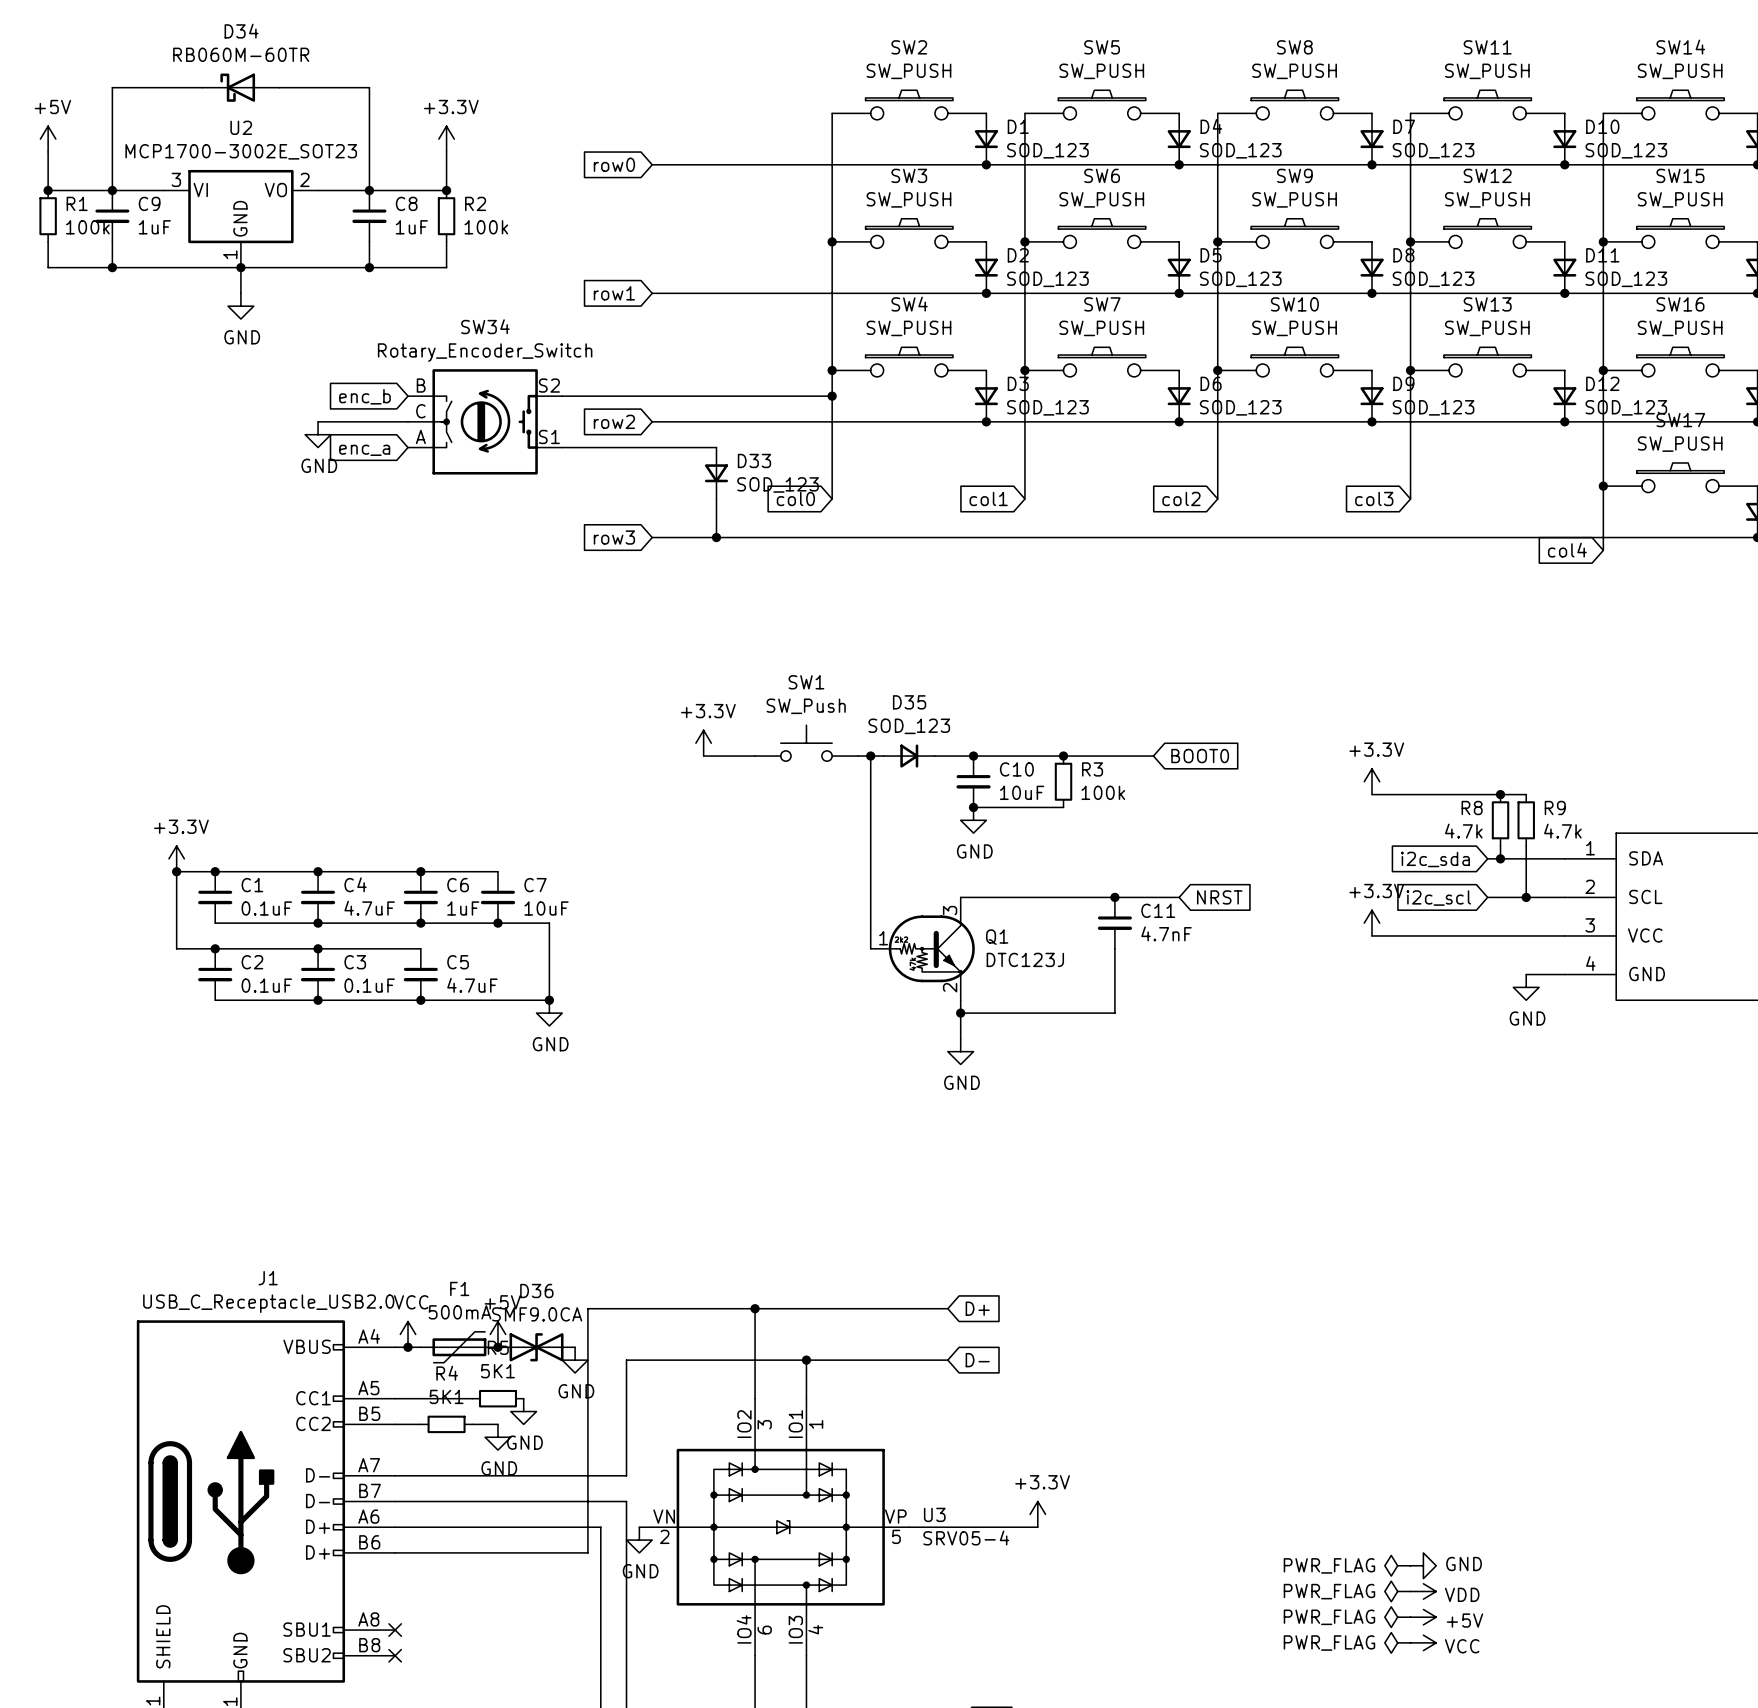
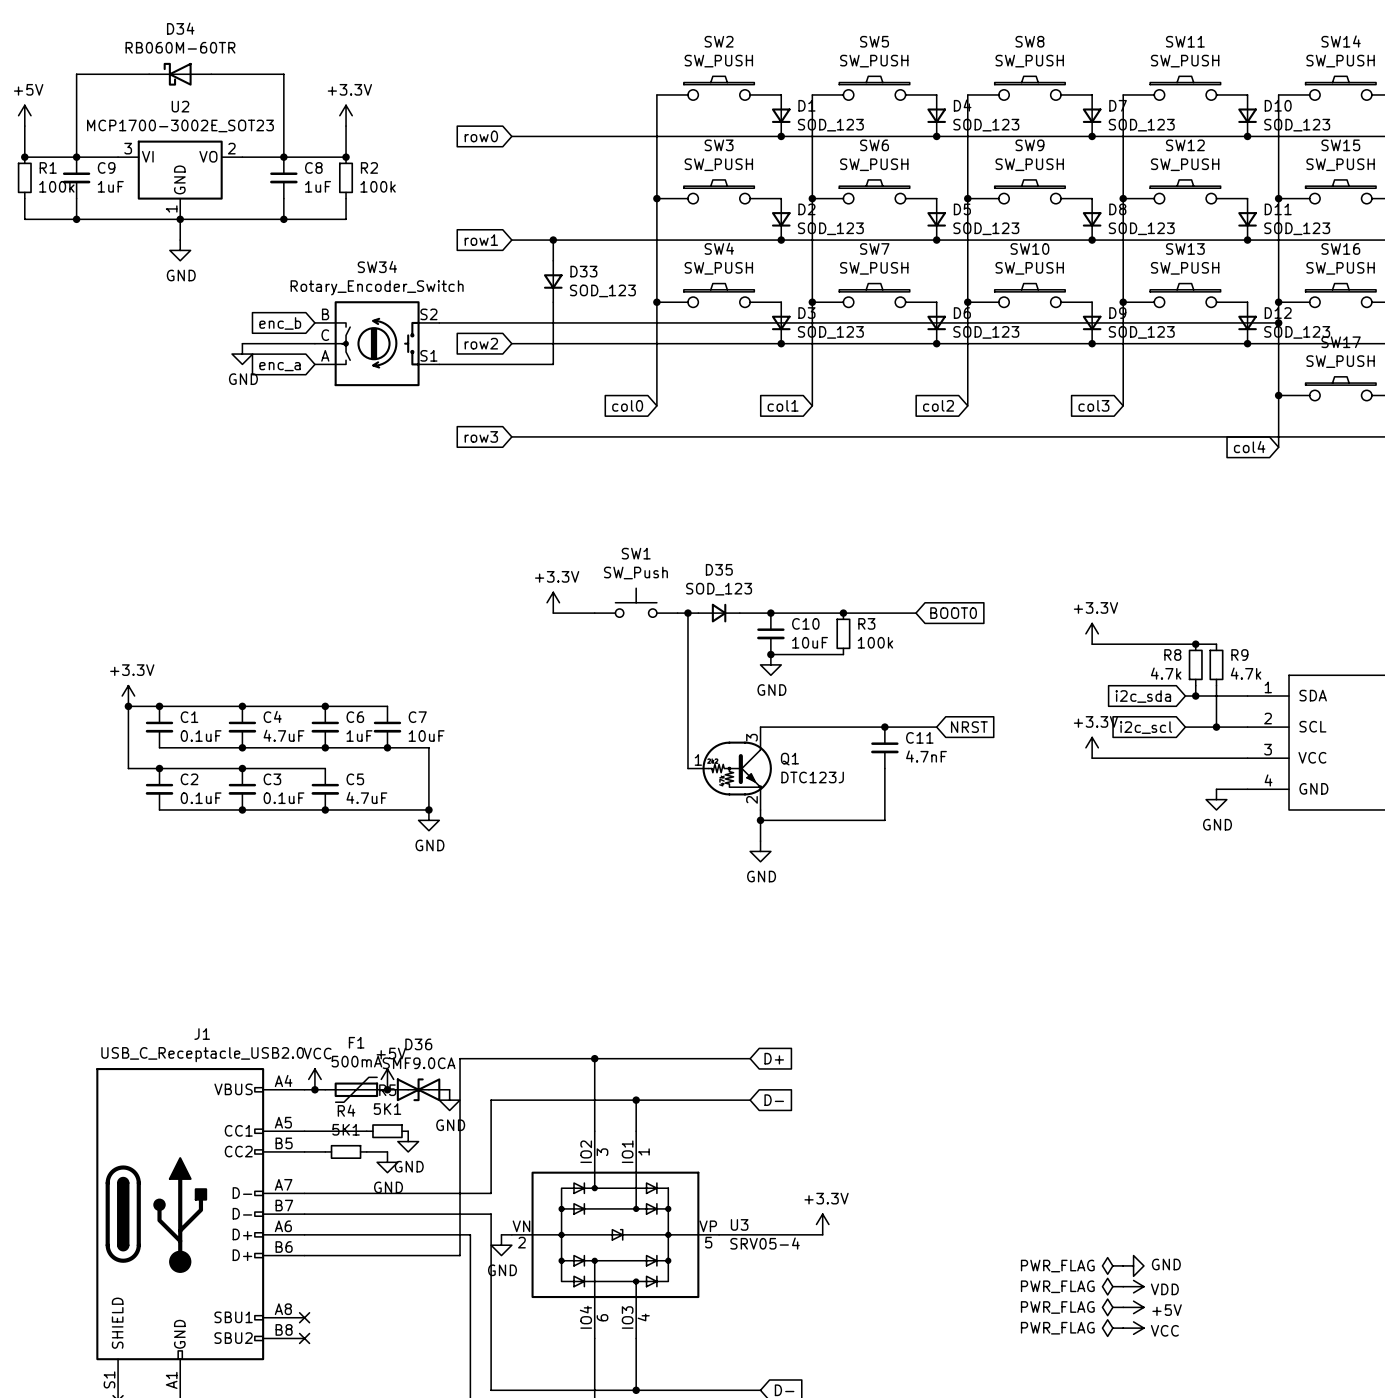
wire: none -> (553, 240) (553, 260)
junction: none -> (553, 240)
wire: none -> (656, 322) (1278, 322)
junction: (832, 396) -> none
junction: none -> (1278, 322)
wire: (703, 447) (716, 447) -> (553, 364) (553, 302)
D33 position: (716, 473) -> (553, 281)
wire: (716, 498) (716, 537) -> none
junction: (716, 537) -> none

